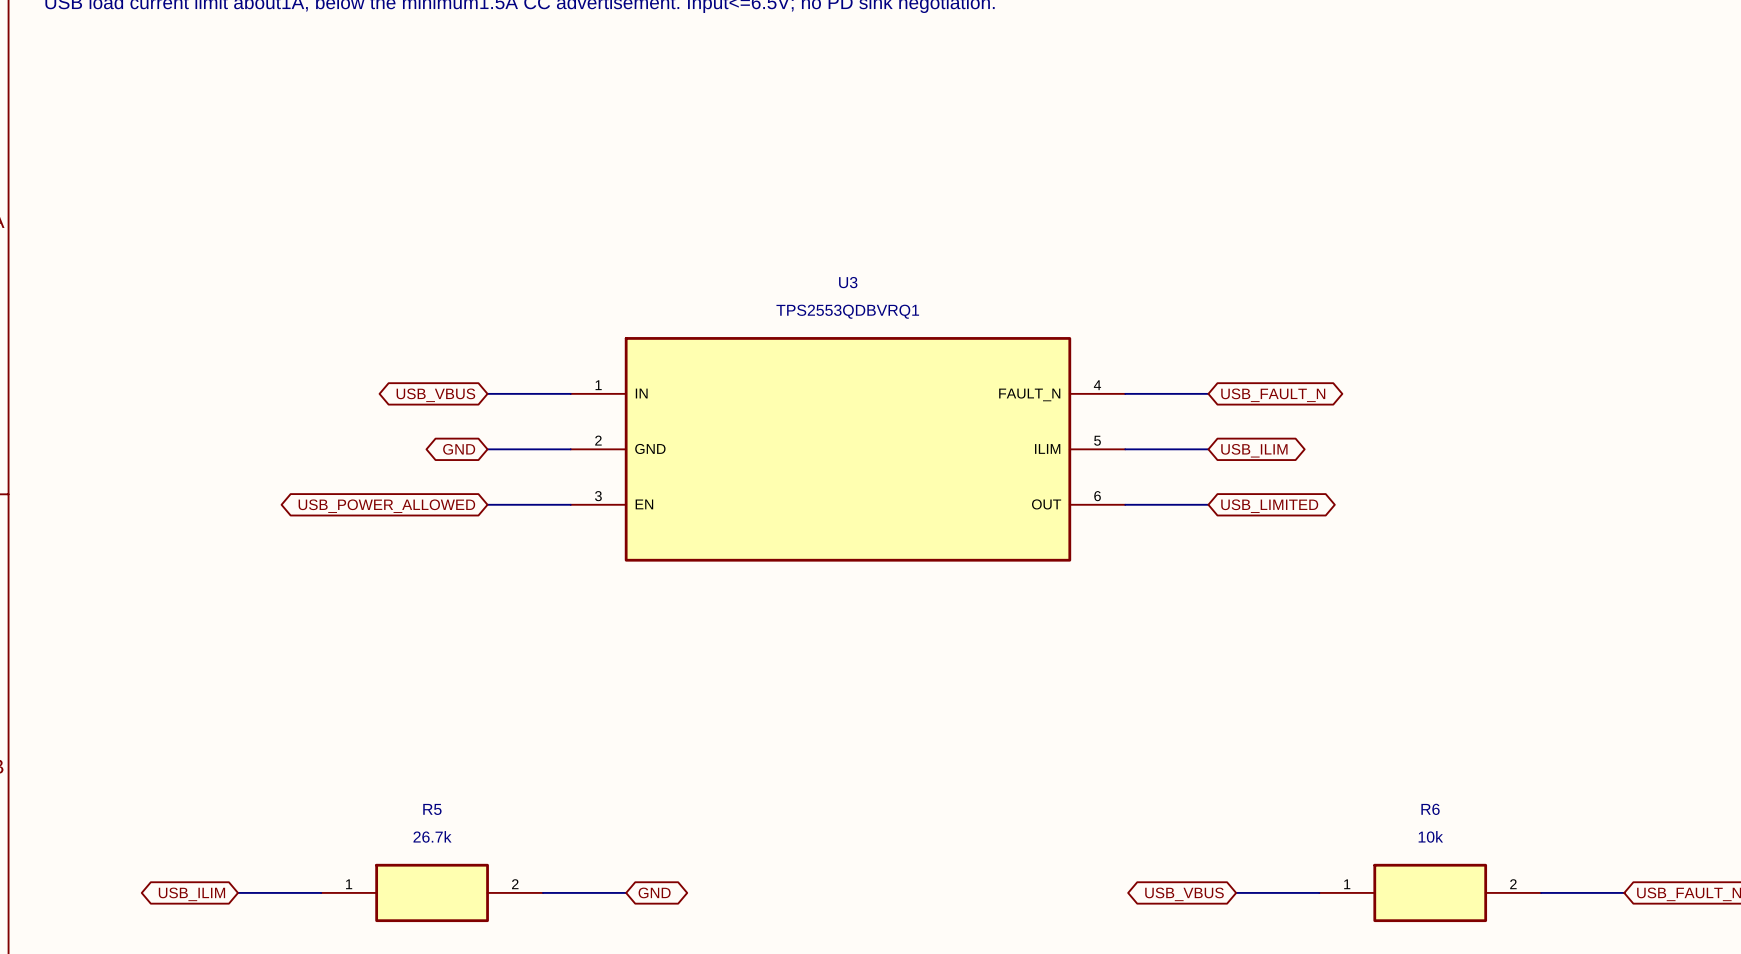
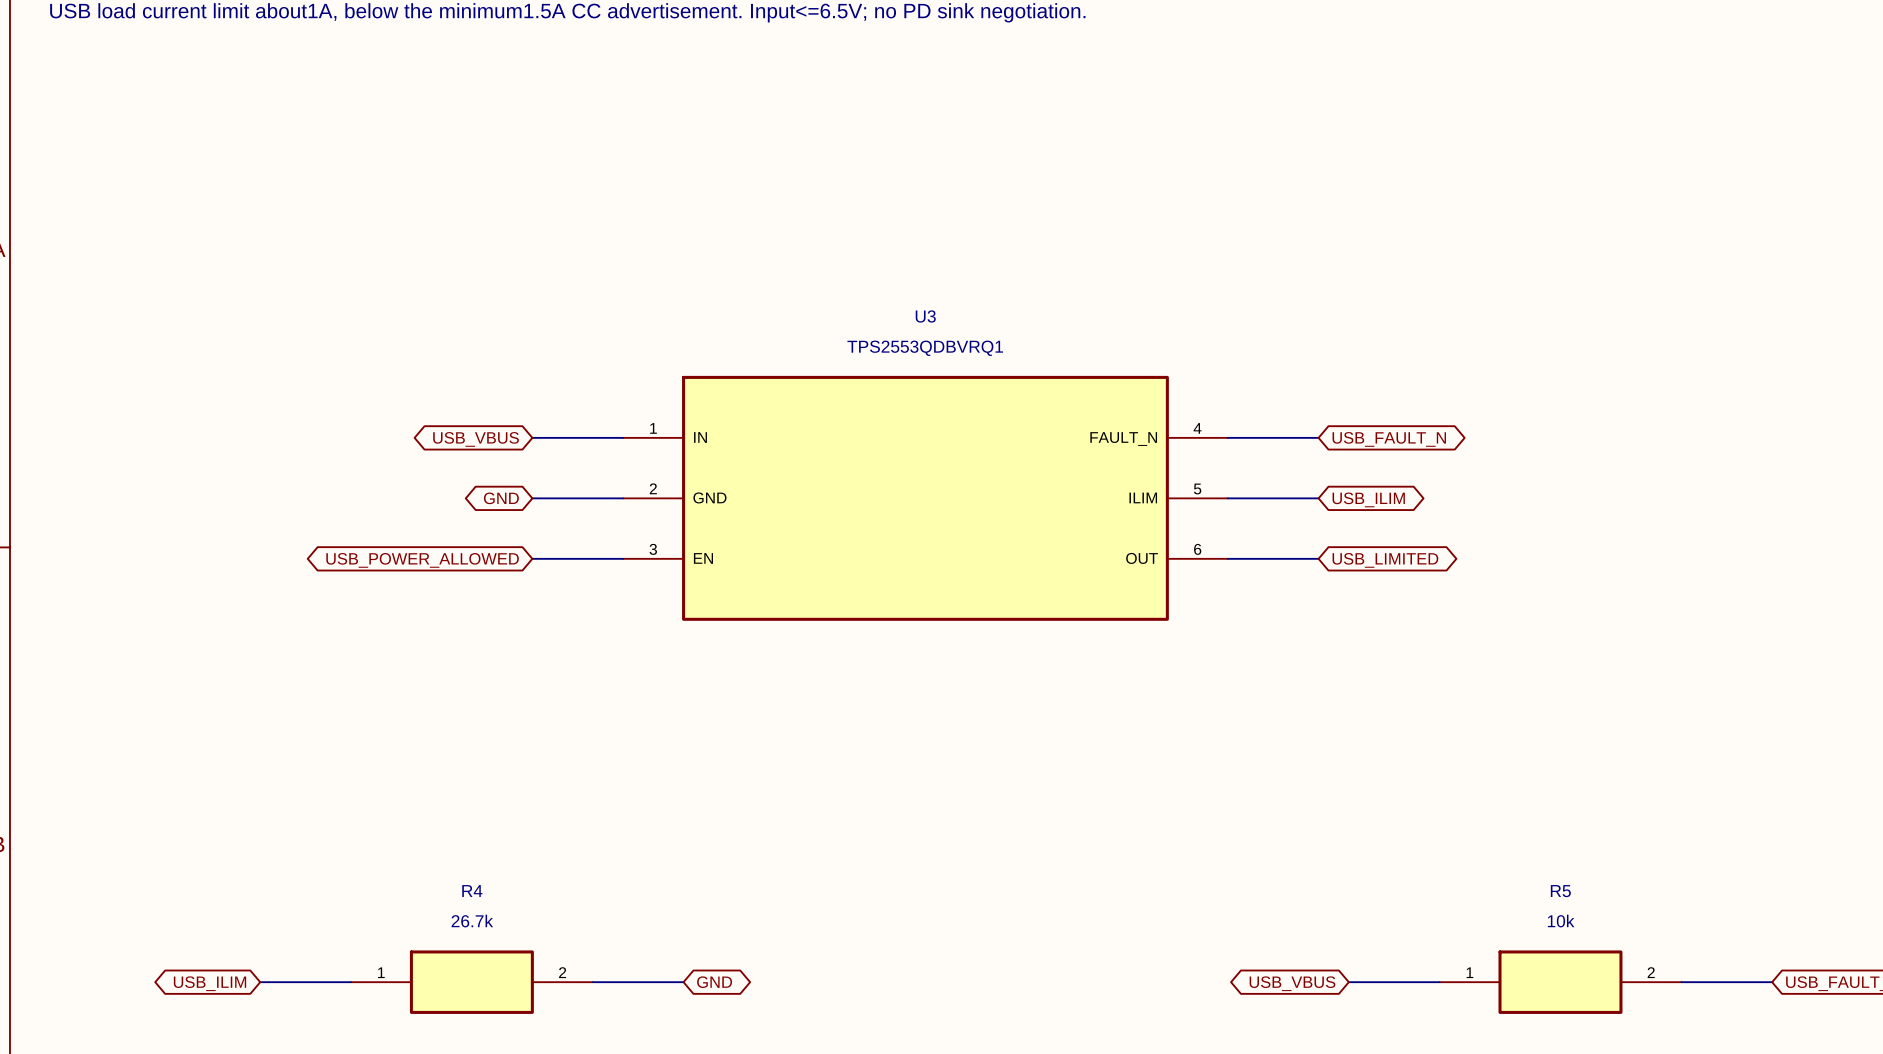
R5 name: R5 (432, 809) -> R4 (472, 891)
R6 name: R6 (1430, 809) -> R5 (1560, 891)

